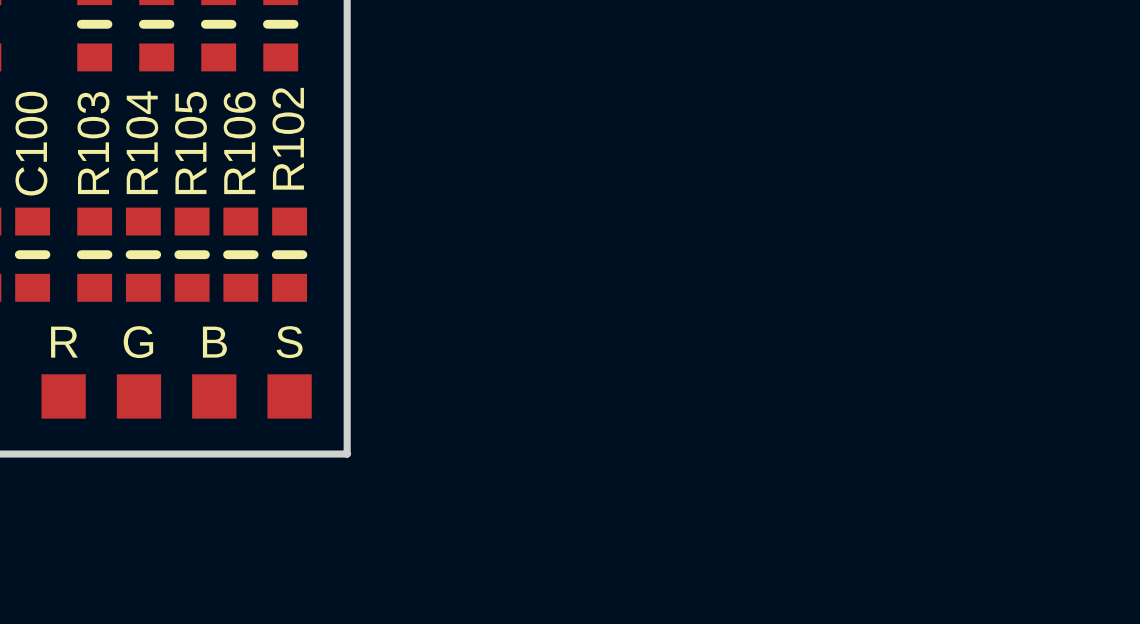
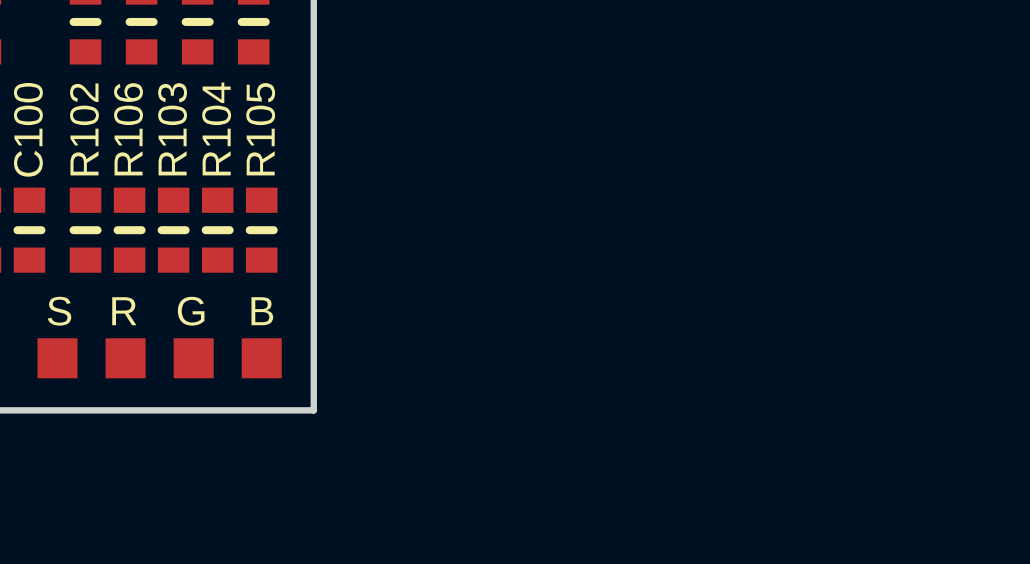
R102 name: R102 (288, 138) -> R105 (260, 129)
R104 name: R104 (142, 142) -> R106 (128, 129)
R103 name: R103 (93, 143) -> R102 (84, 129)
R105 name: R105 (190, 143) -> R103 (172, 129)
R106 name: R106 (239, 143) -> R104 (216, 129)
text: R (64, 342) -> S (59, 311)
text: G (138, 342) -> R (124, 311)
text: B (214, 342) -> G (191, 311)
text: S (289, 342) -> B (262, 311)

